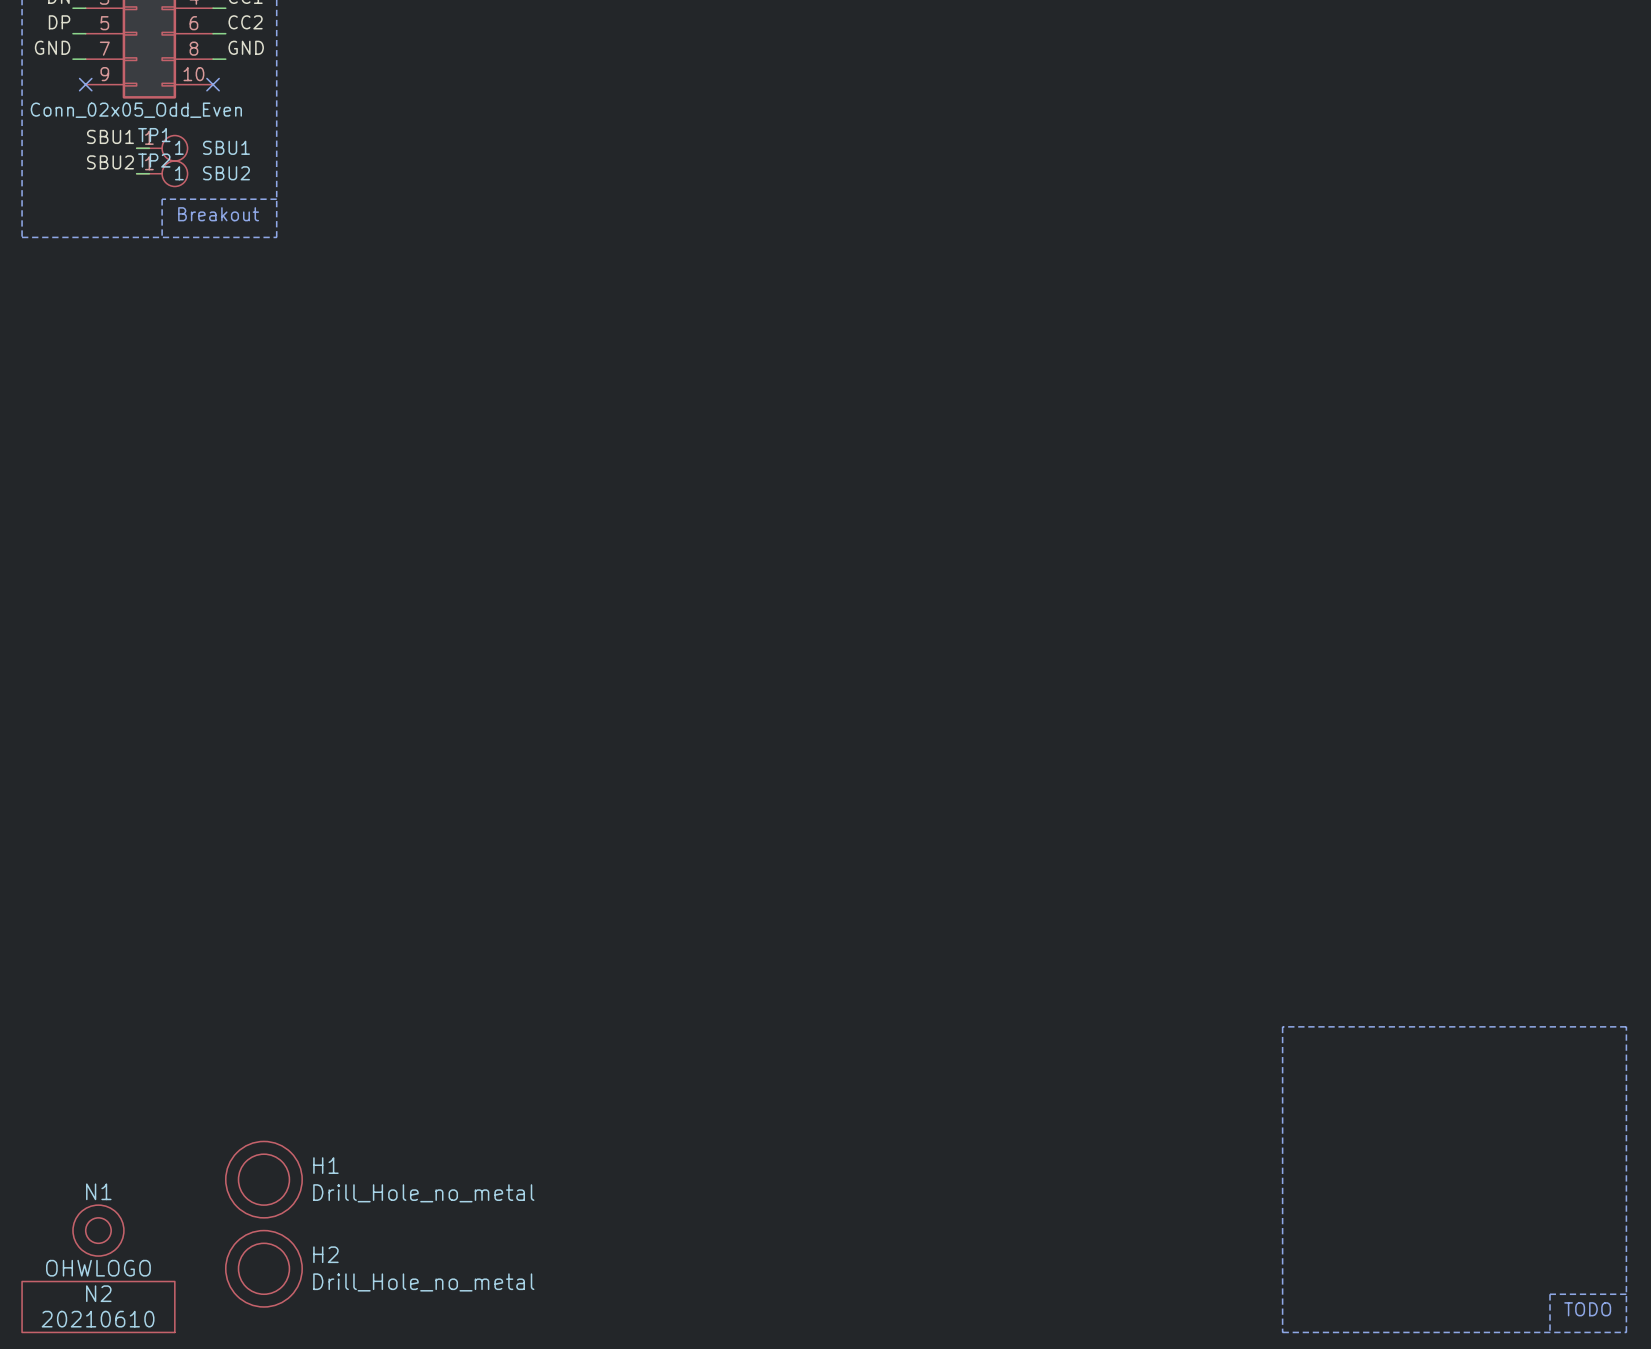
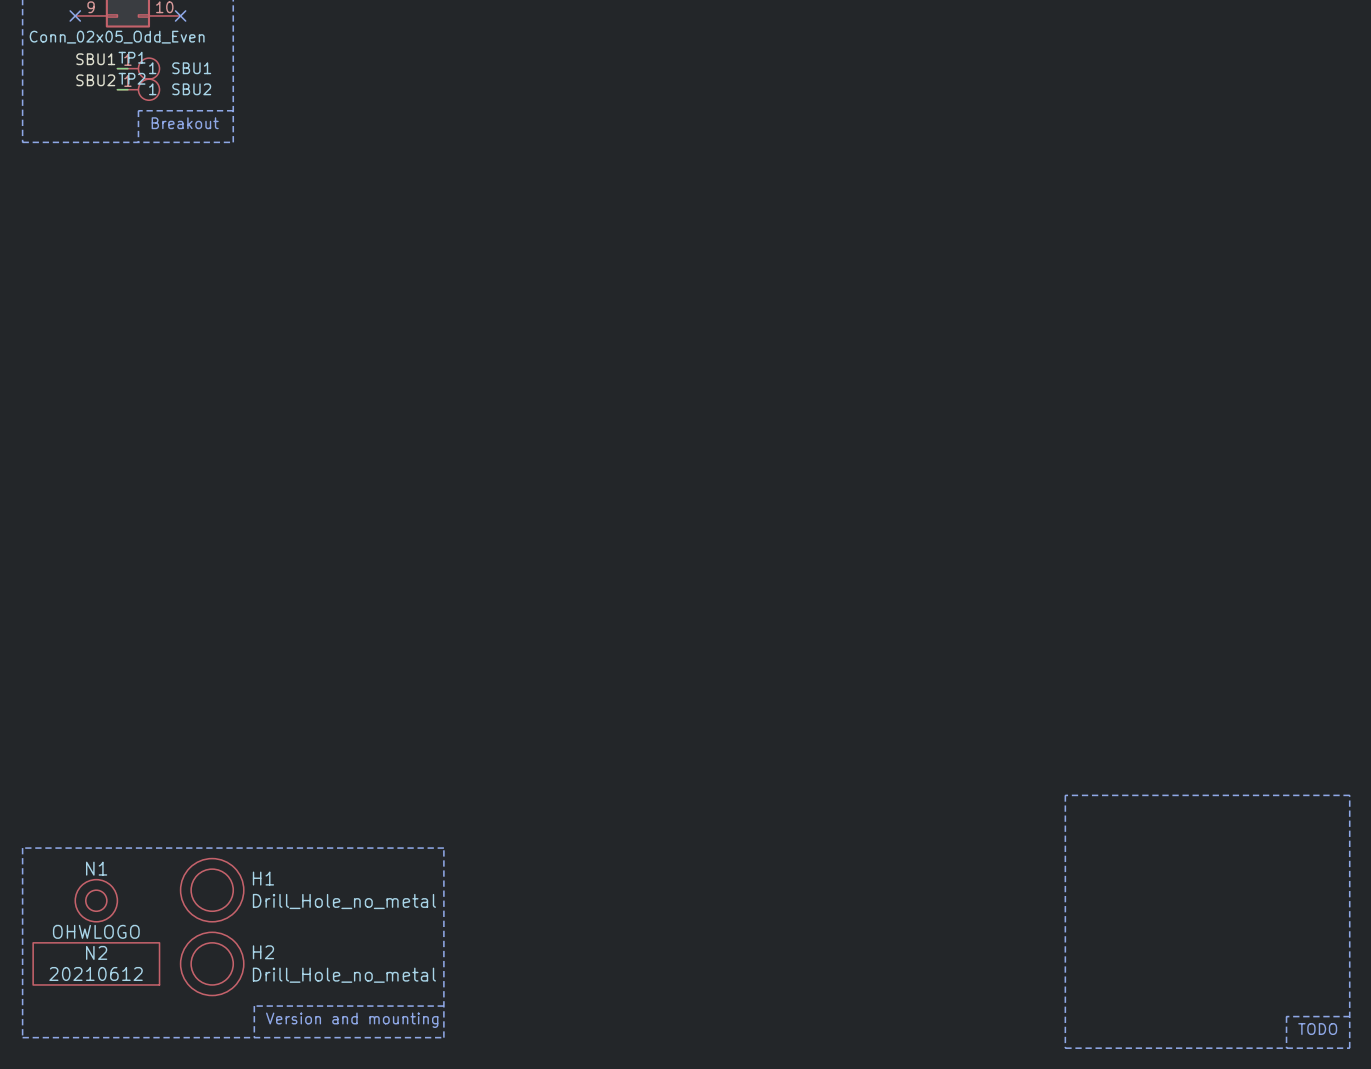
line: none -> (22, 848) (443, 848) (443, 1037) (22, 1037) (22, 848)
H1 position: (263, 1179) -> (212, 890)
N1 position: (98, 1230) -> (96, 900)
H2 position: (263, 1268) -> (212, 963)
line: none -> (443, 1006) (254, 1006) (254, 1037)
text: none -> Version and mounting (352, 1020)
N2 position: (98, 1306) -> (96, 963)
N2 value: 20210610 (98, 1319) -> 20210612 (96, 973)

